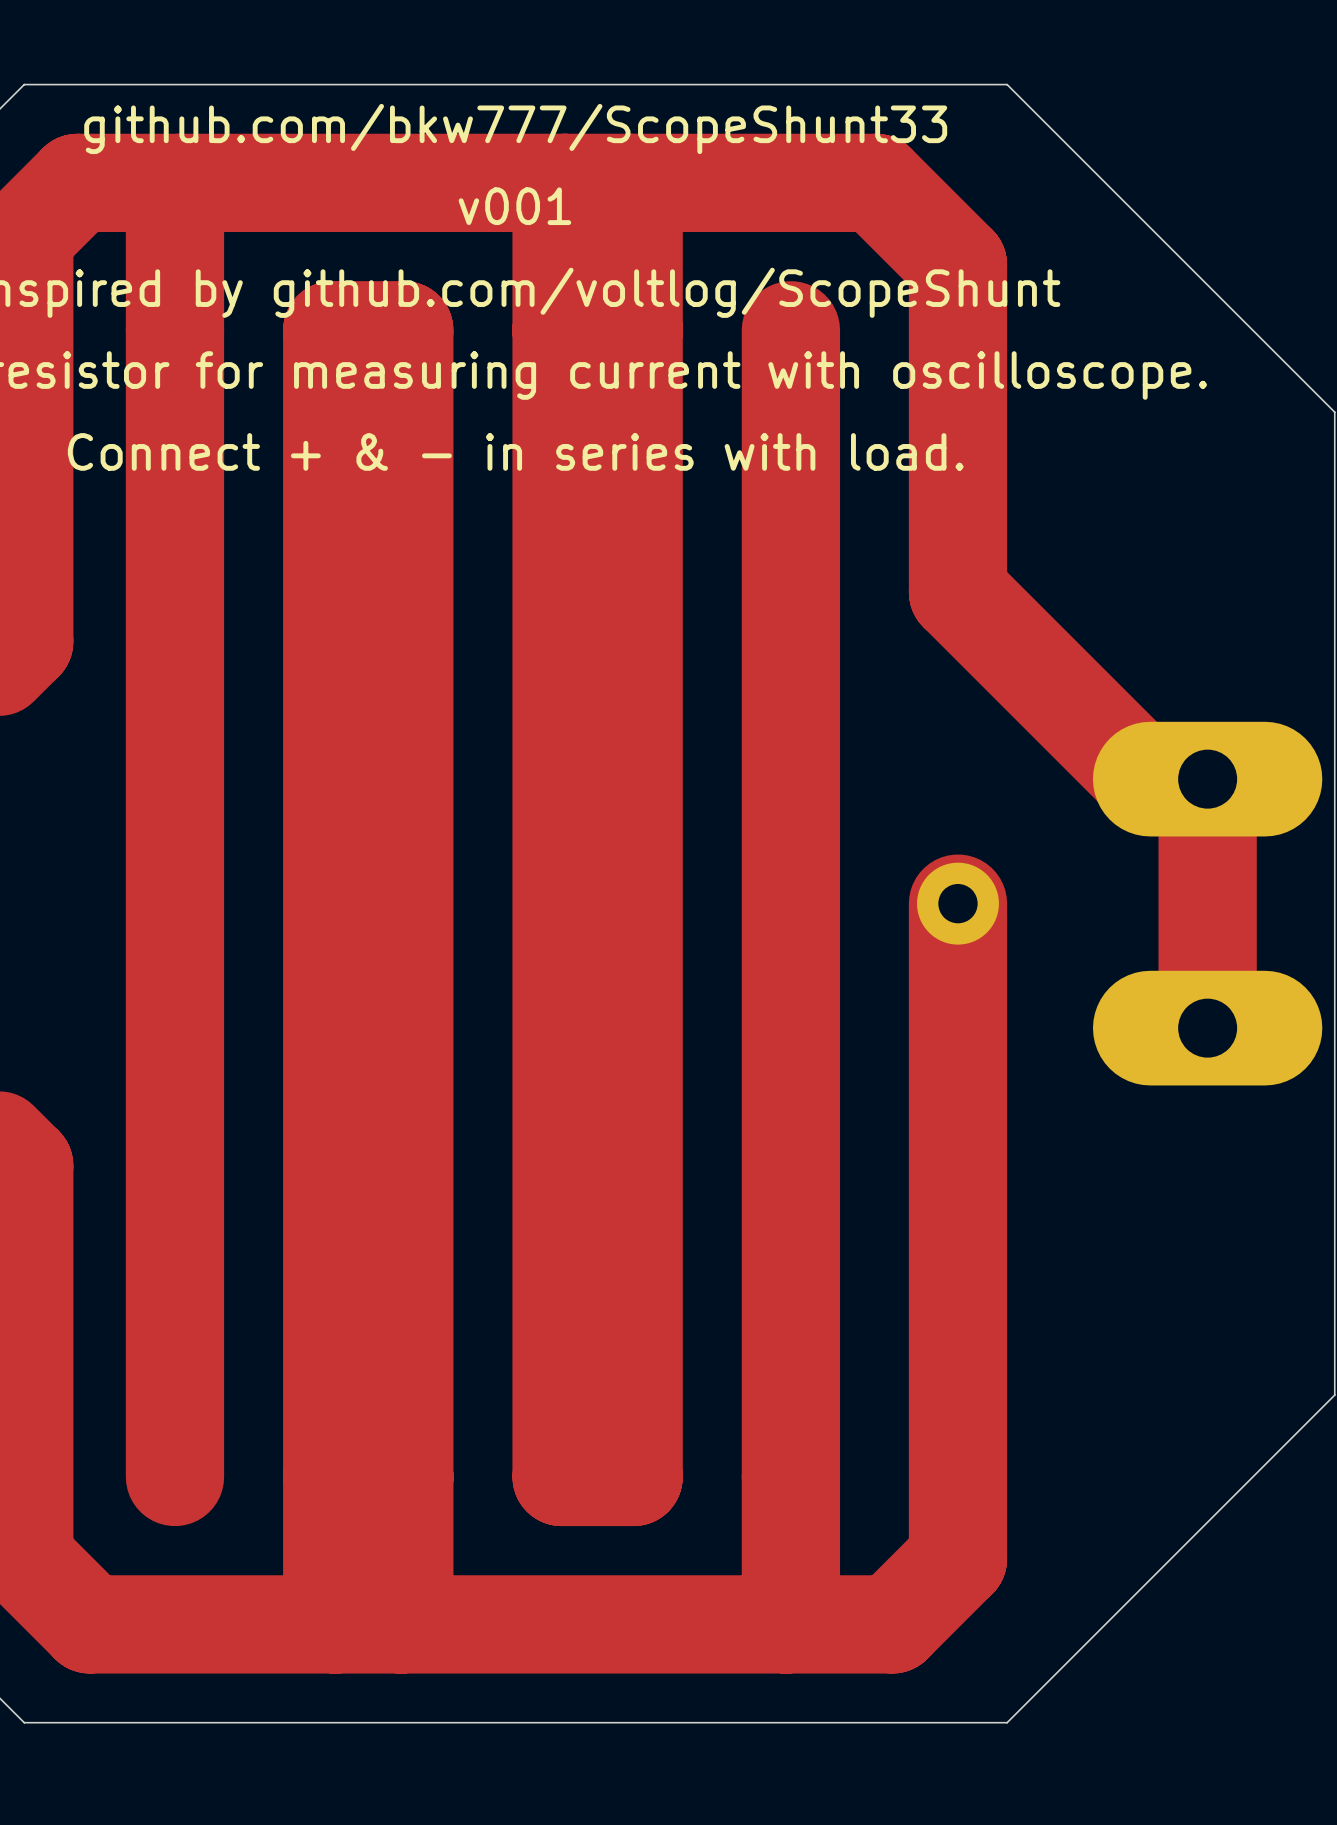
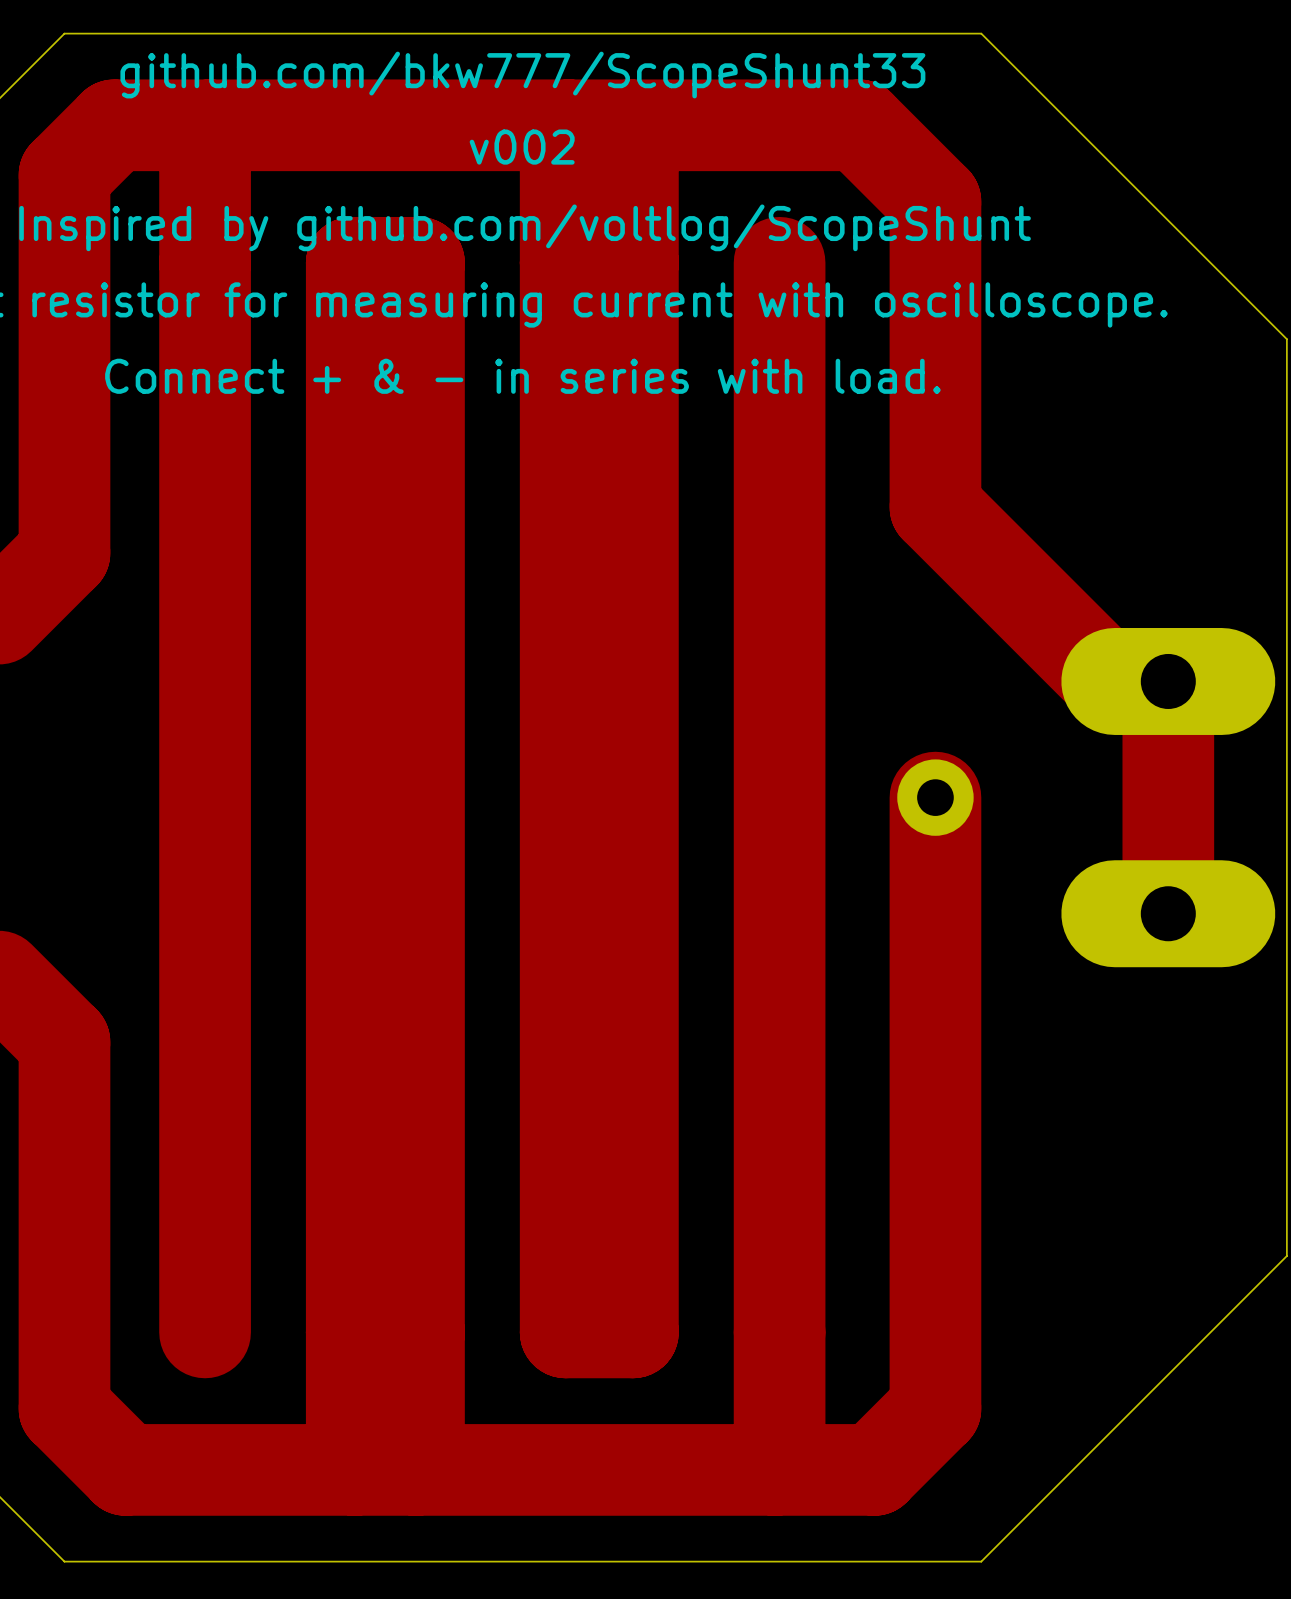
text: v001 (514, 206) -> v002 (522, 147)

